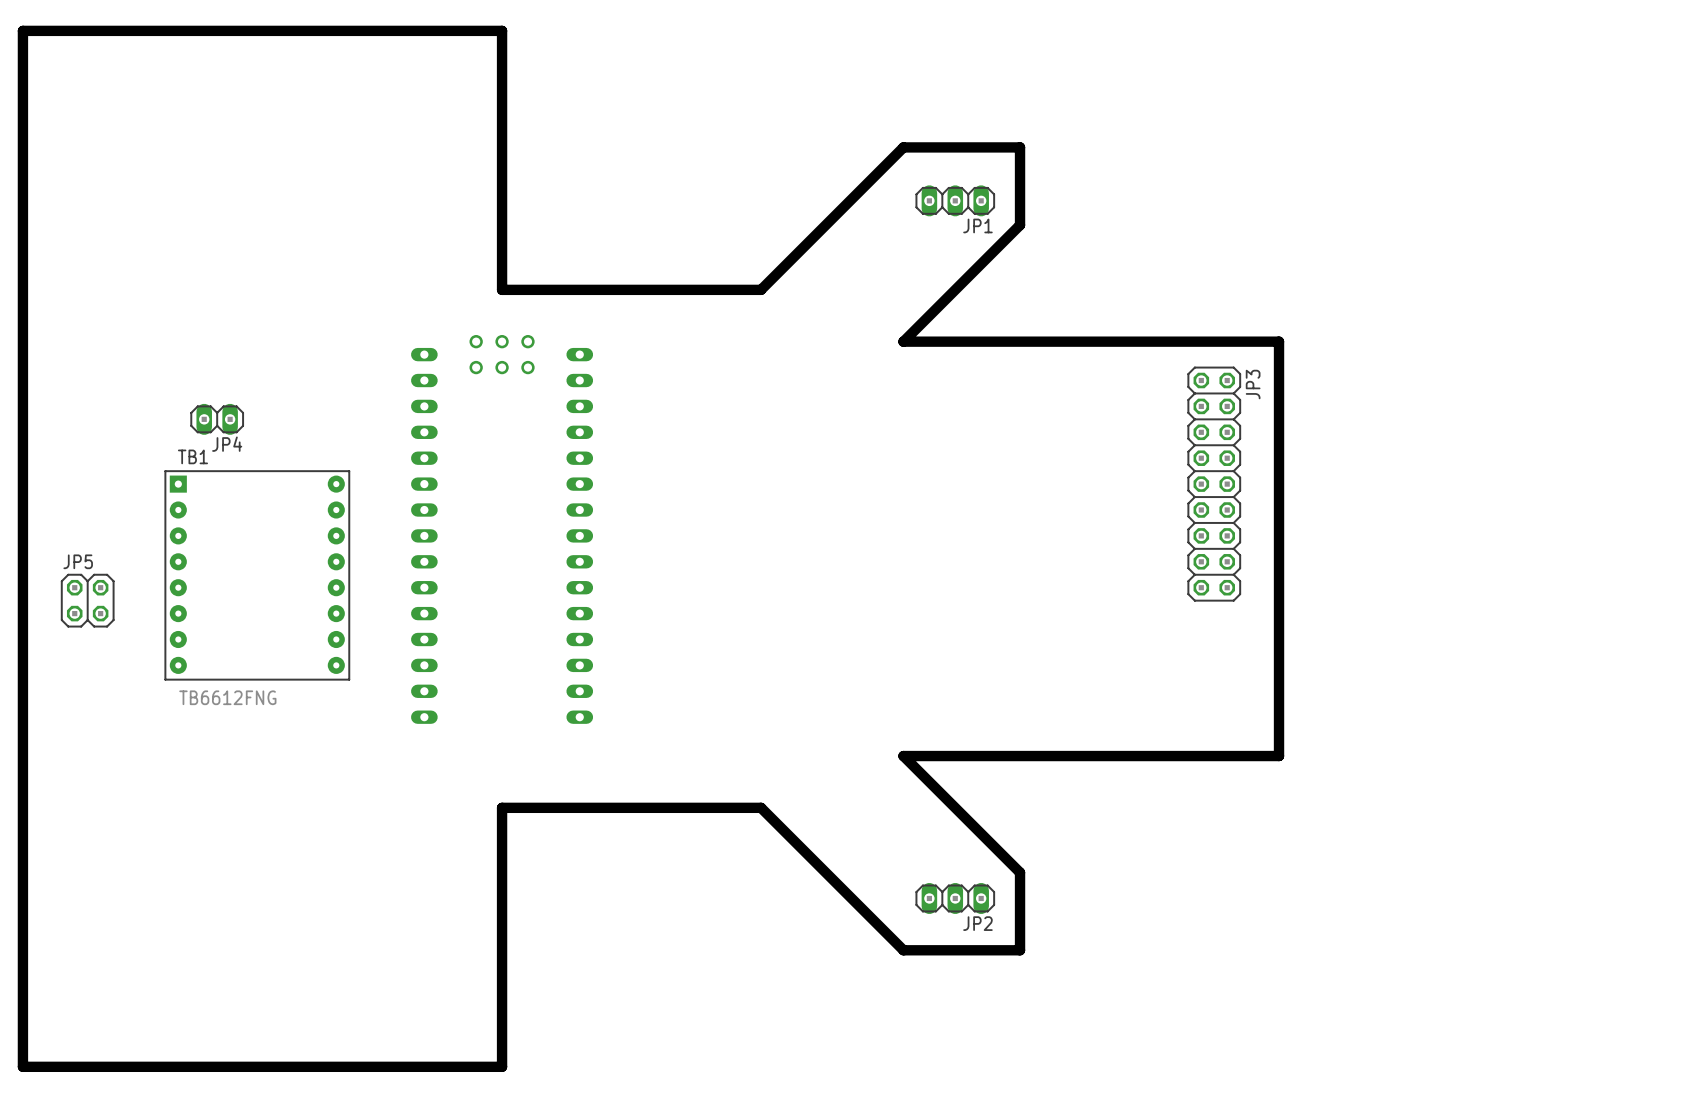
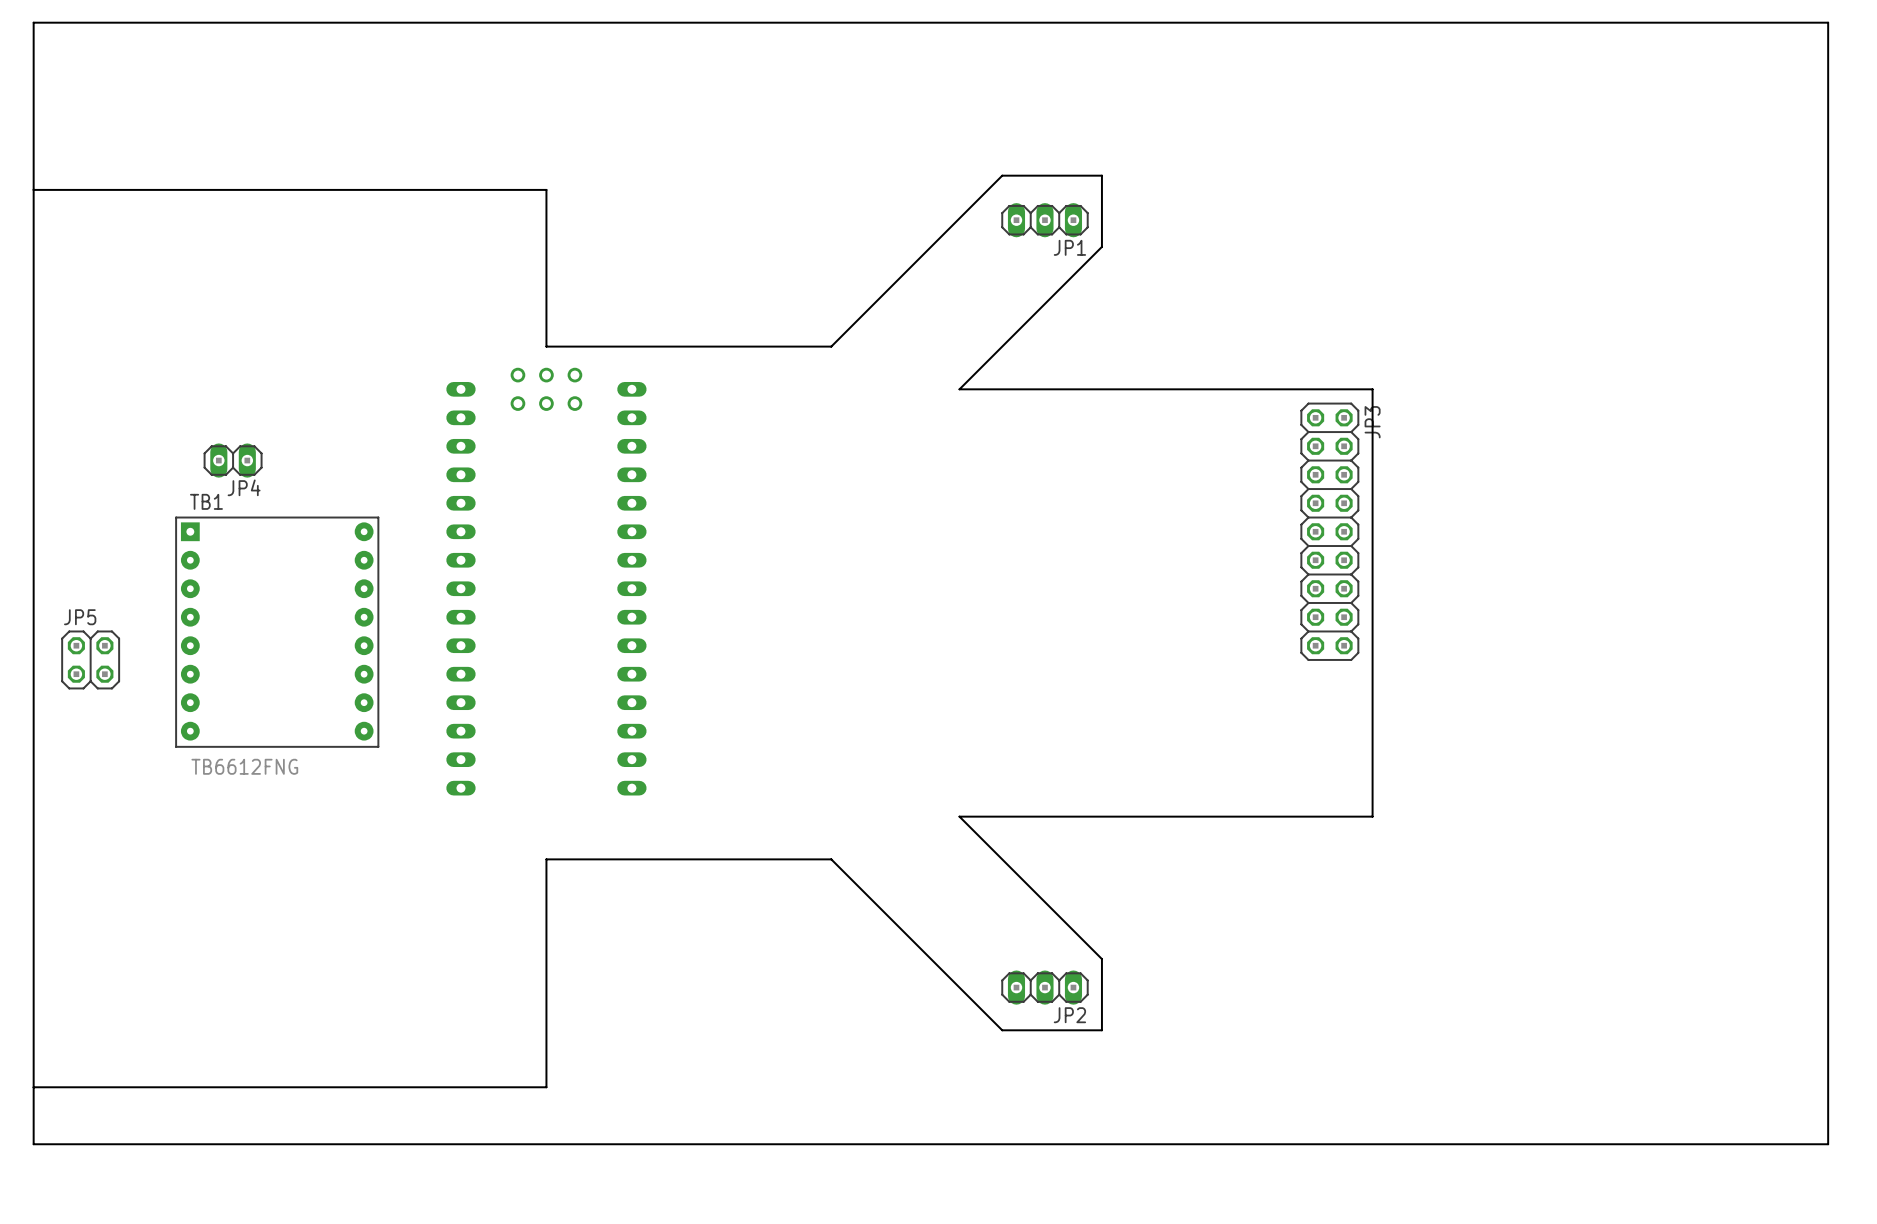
board edge: none -> (33, 22) (1828, 22) (1828, 1144) (33, 1144) (33, 22)
board edge: (502, 173) (502, 30) (22, 30) (22, 1066) (502, 1066) (502, 989) -> (546, 189) (33, 189)
board edge width: thick (502, 173) (502, 289) -> thin (546, 189) (546, 318)
board edge: (502, 289) (761, 289) (903, 147) (1020, 147) (1020, 225) (903, 341) (1279, 341) (1279, 756) (903, 756) (1020, 872) (1020, 950) (903, 950) (761, 807) (502, 807) -> (546, 318) (546, 346) (831, 346) (1002, 175) (1101, 175) (1101, 246) (959, 389) (1372, 389) (1372, 816) (959, 816) (1101, 959) (1101, 1030) (1002, 1030) (831, 859) (546, 859) (546, 887)
board edge width: thick (502, 807) (502, 989) -> thin (546, 887) (546, 1087)
board edge: none -> (33, 1087) (546, 1087)

